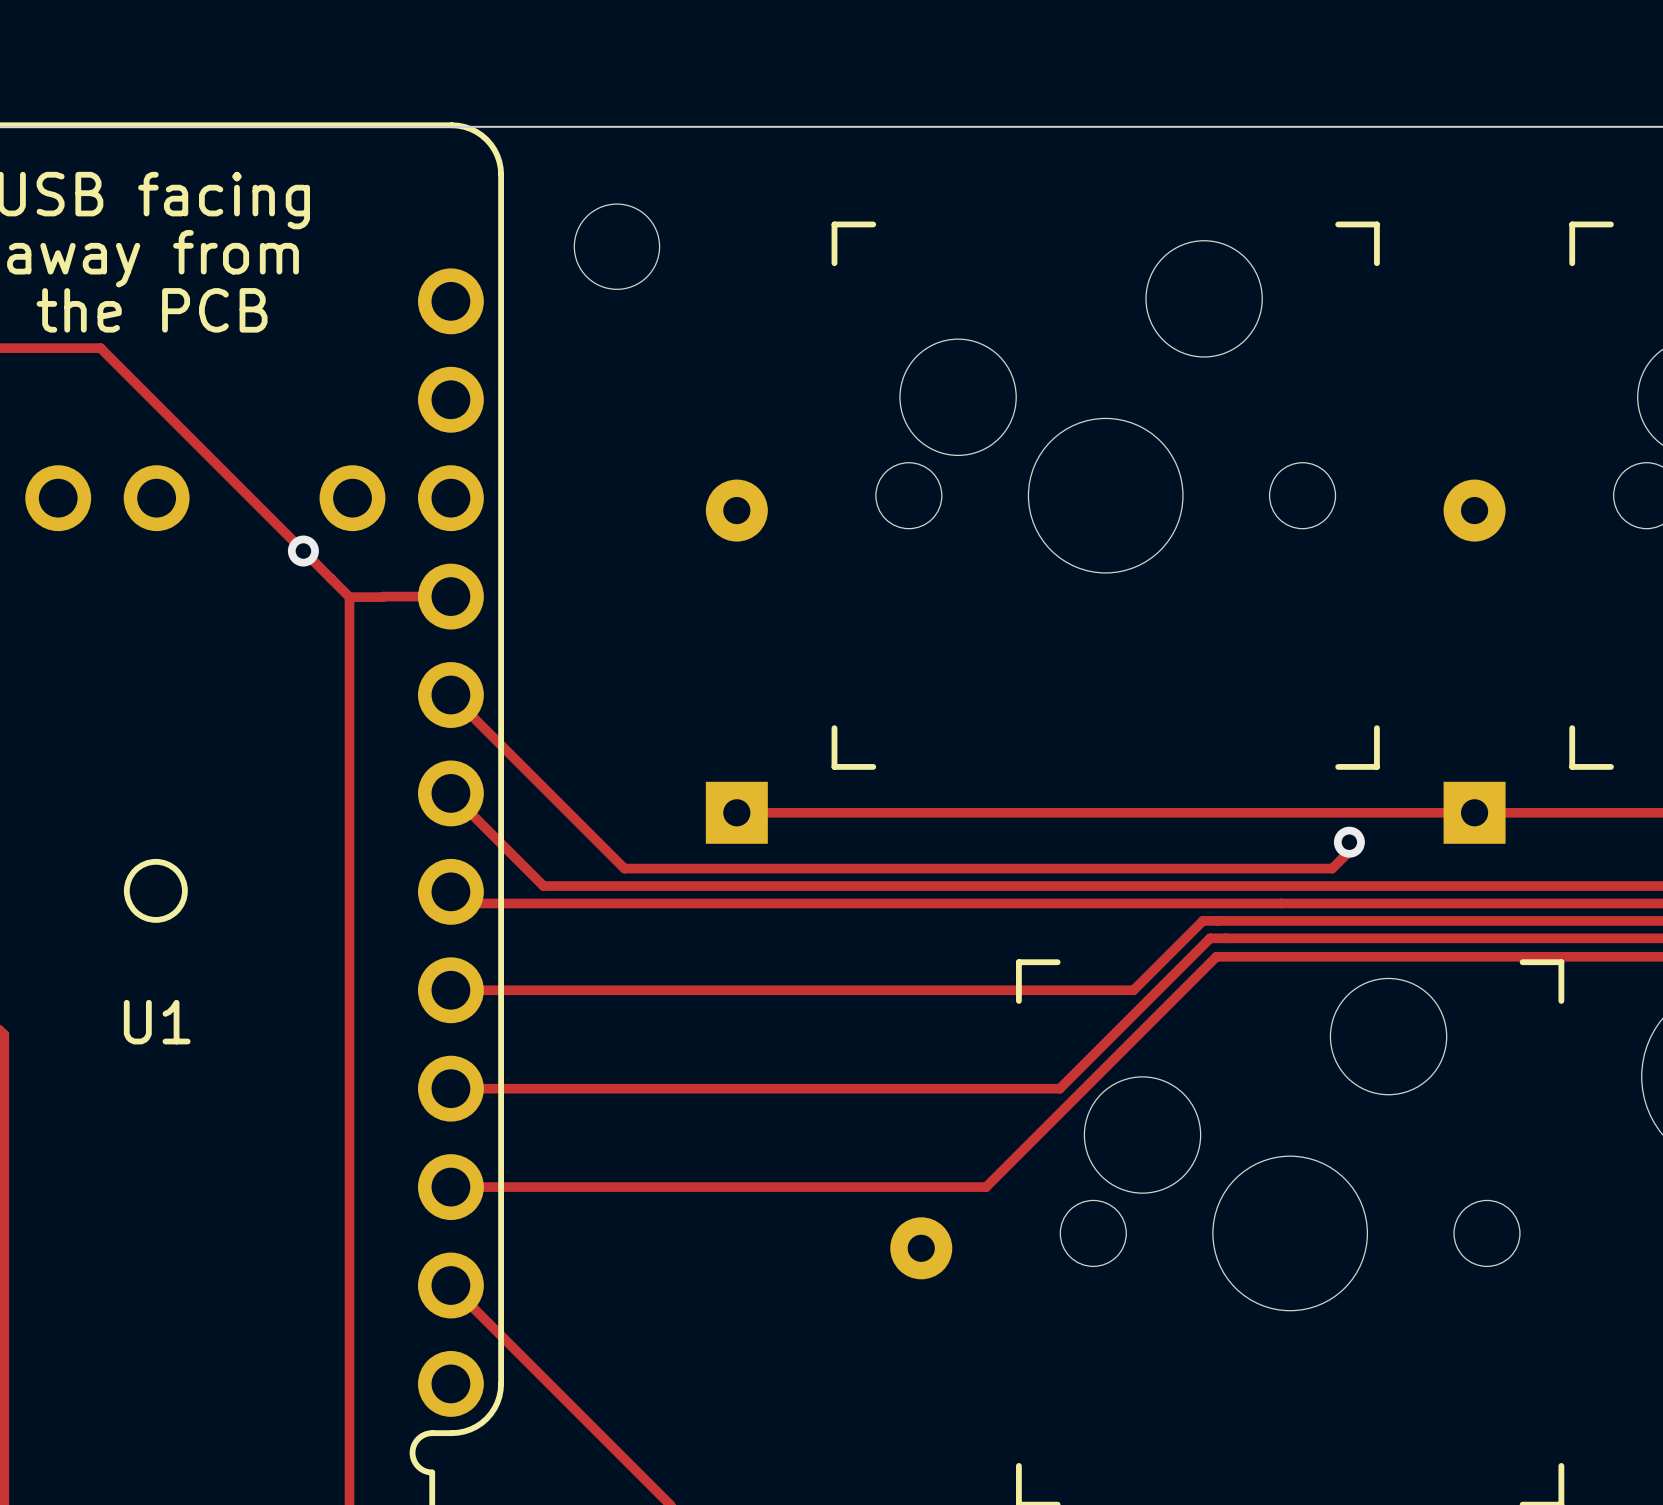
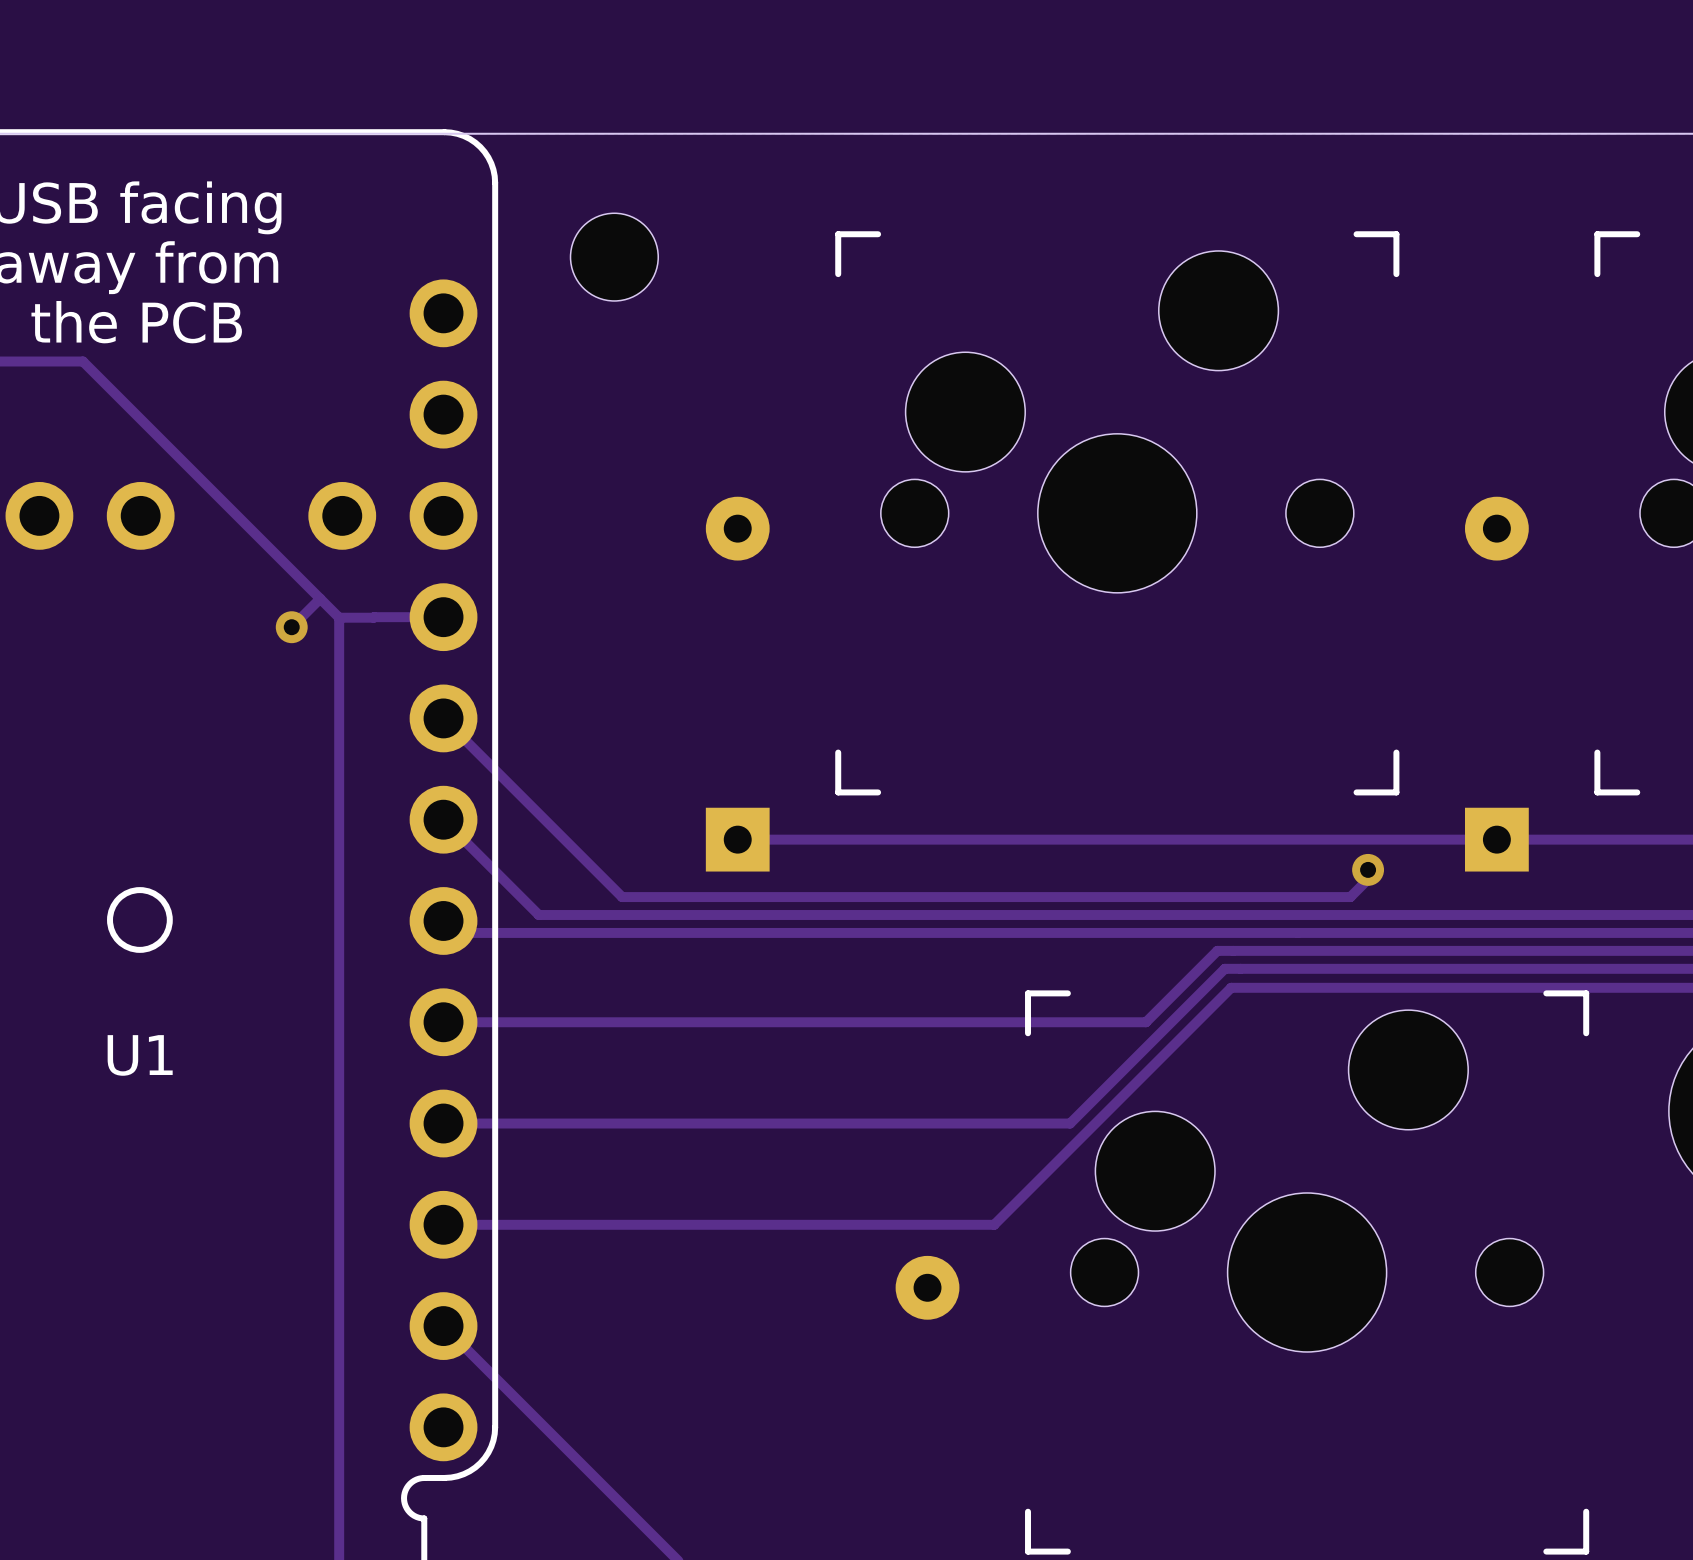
via position: (303, 551) -> (291, 627)
track: none -> (320, 598) (291, 627)

